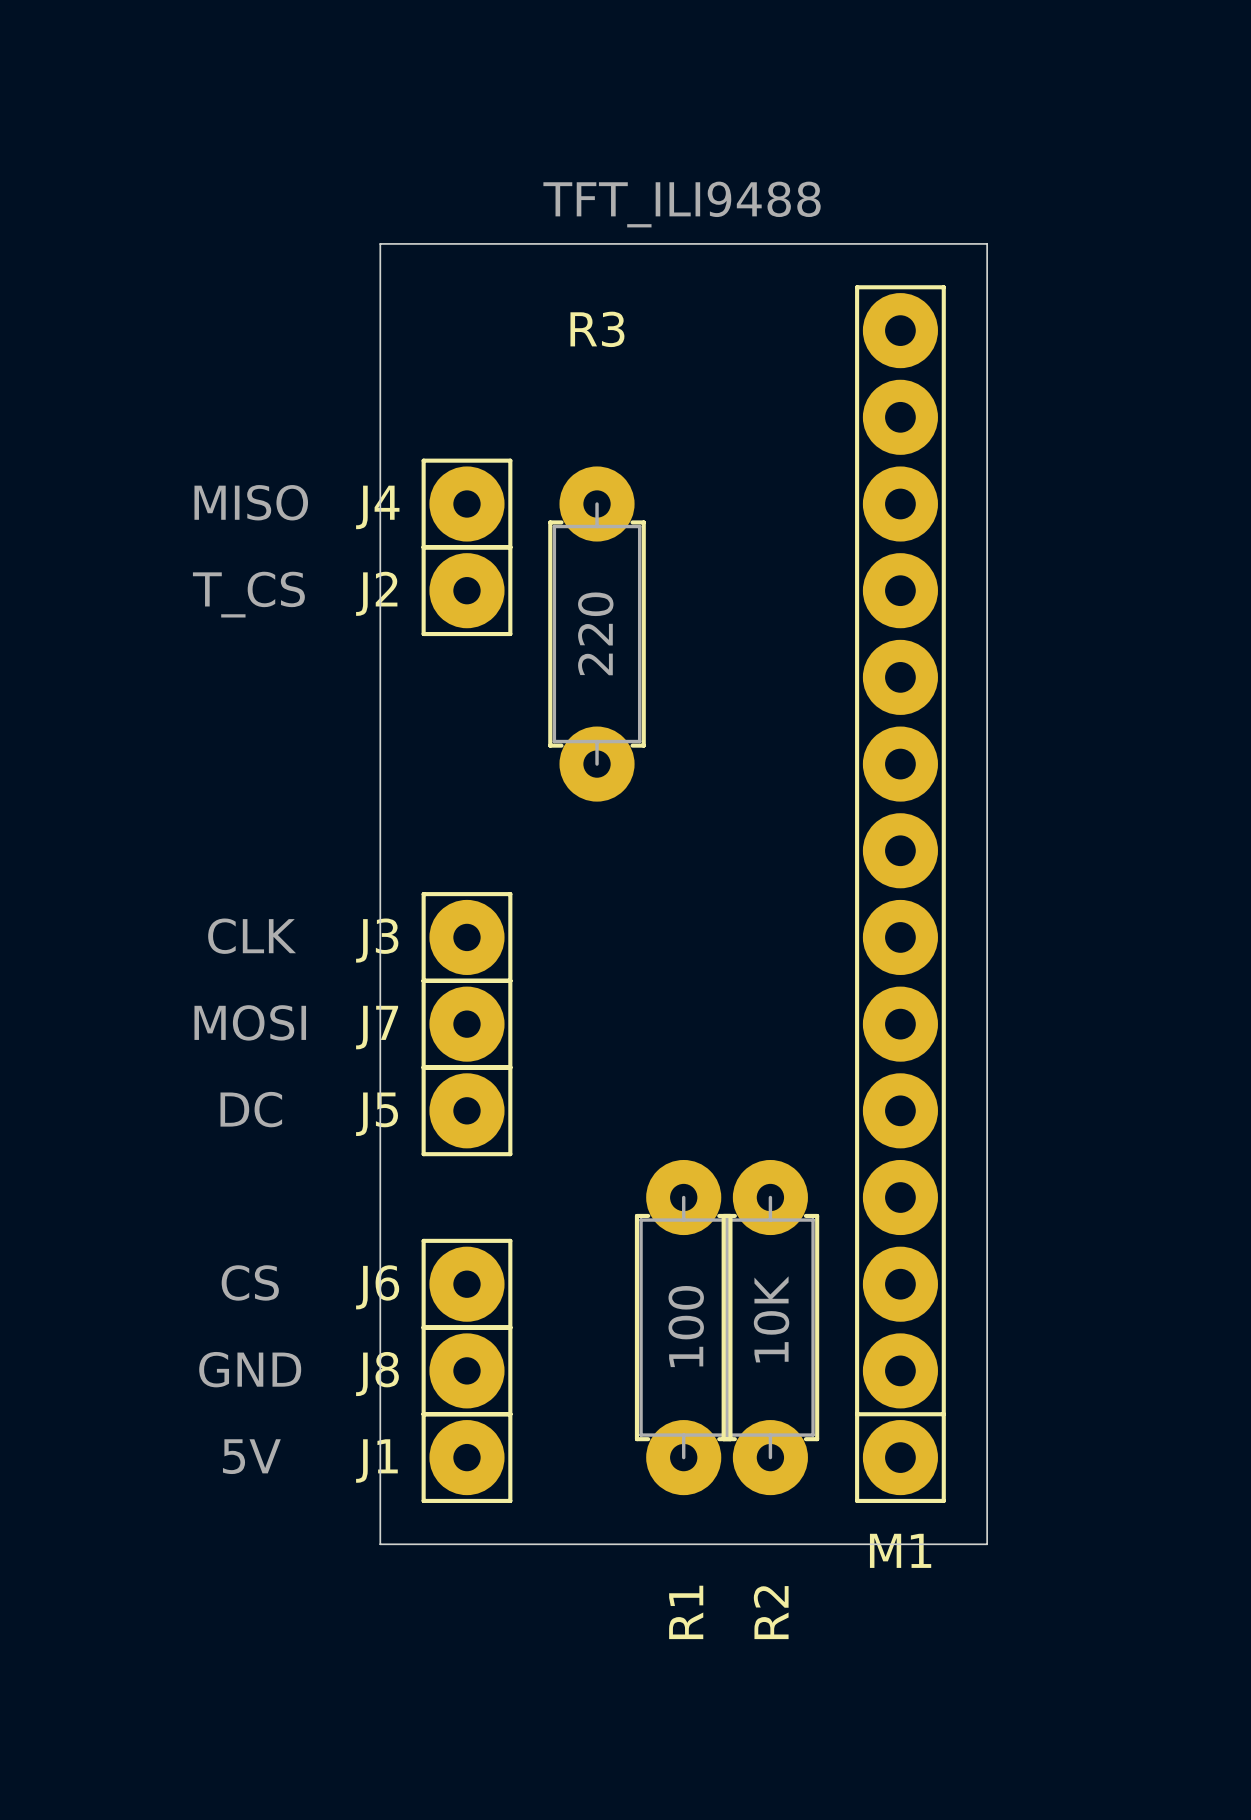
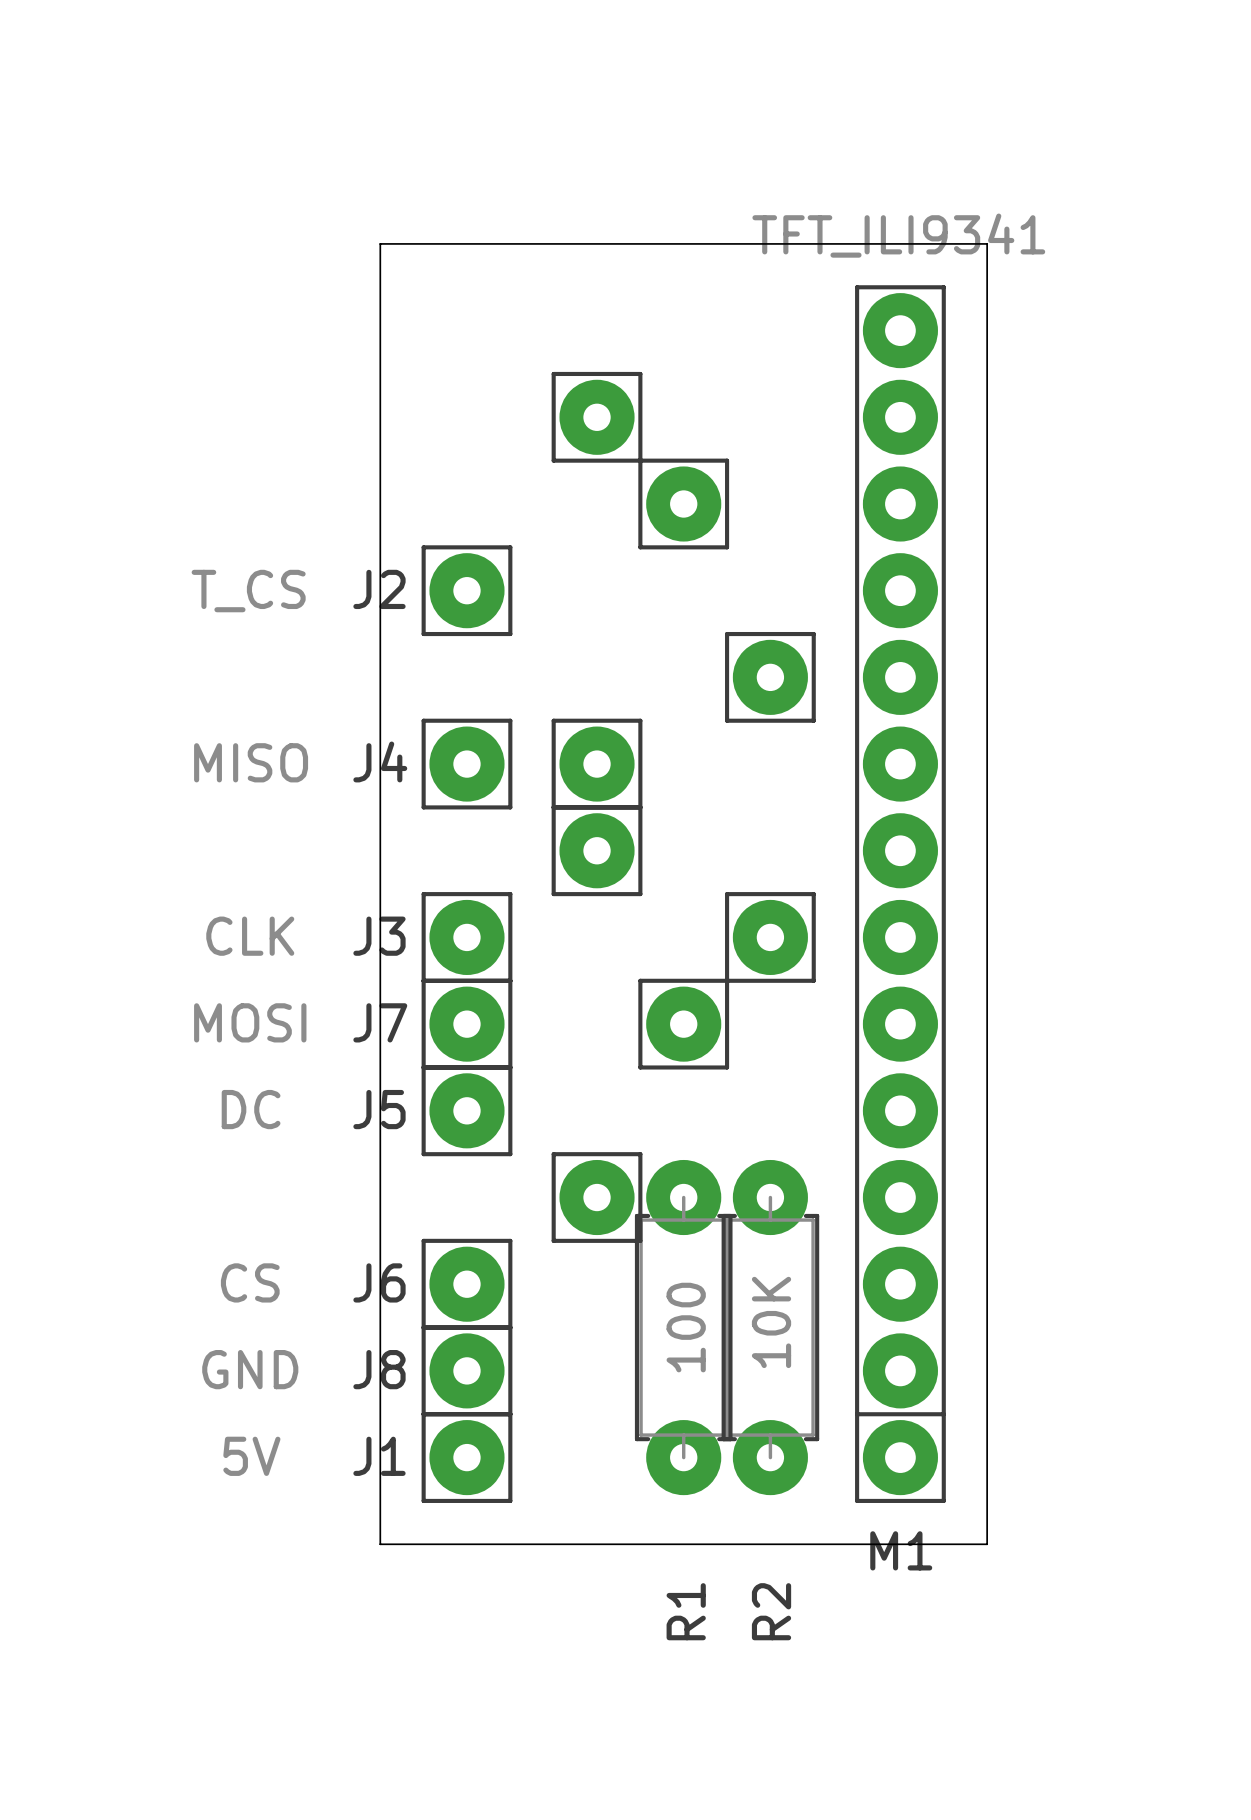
M1 value: TFT_ILI9488 (682, 204) -> TFT_ILI9341 (898, 235)
part: none -> (597, 417)
J4 position: (466, 504) -> (466, 764)
part: none -> (683, 504)
R3: 220 (597, 634) -> none
part: none -> (770, 677)
part: none -> (597, 764)
part: none -> (597, 850)
part: none -> (770, 937)
part: none -> (683, 1024)
part: none -> (597, 1197)

